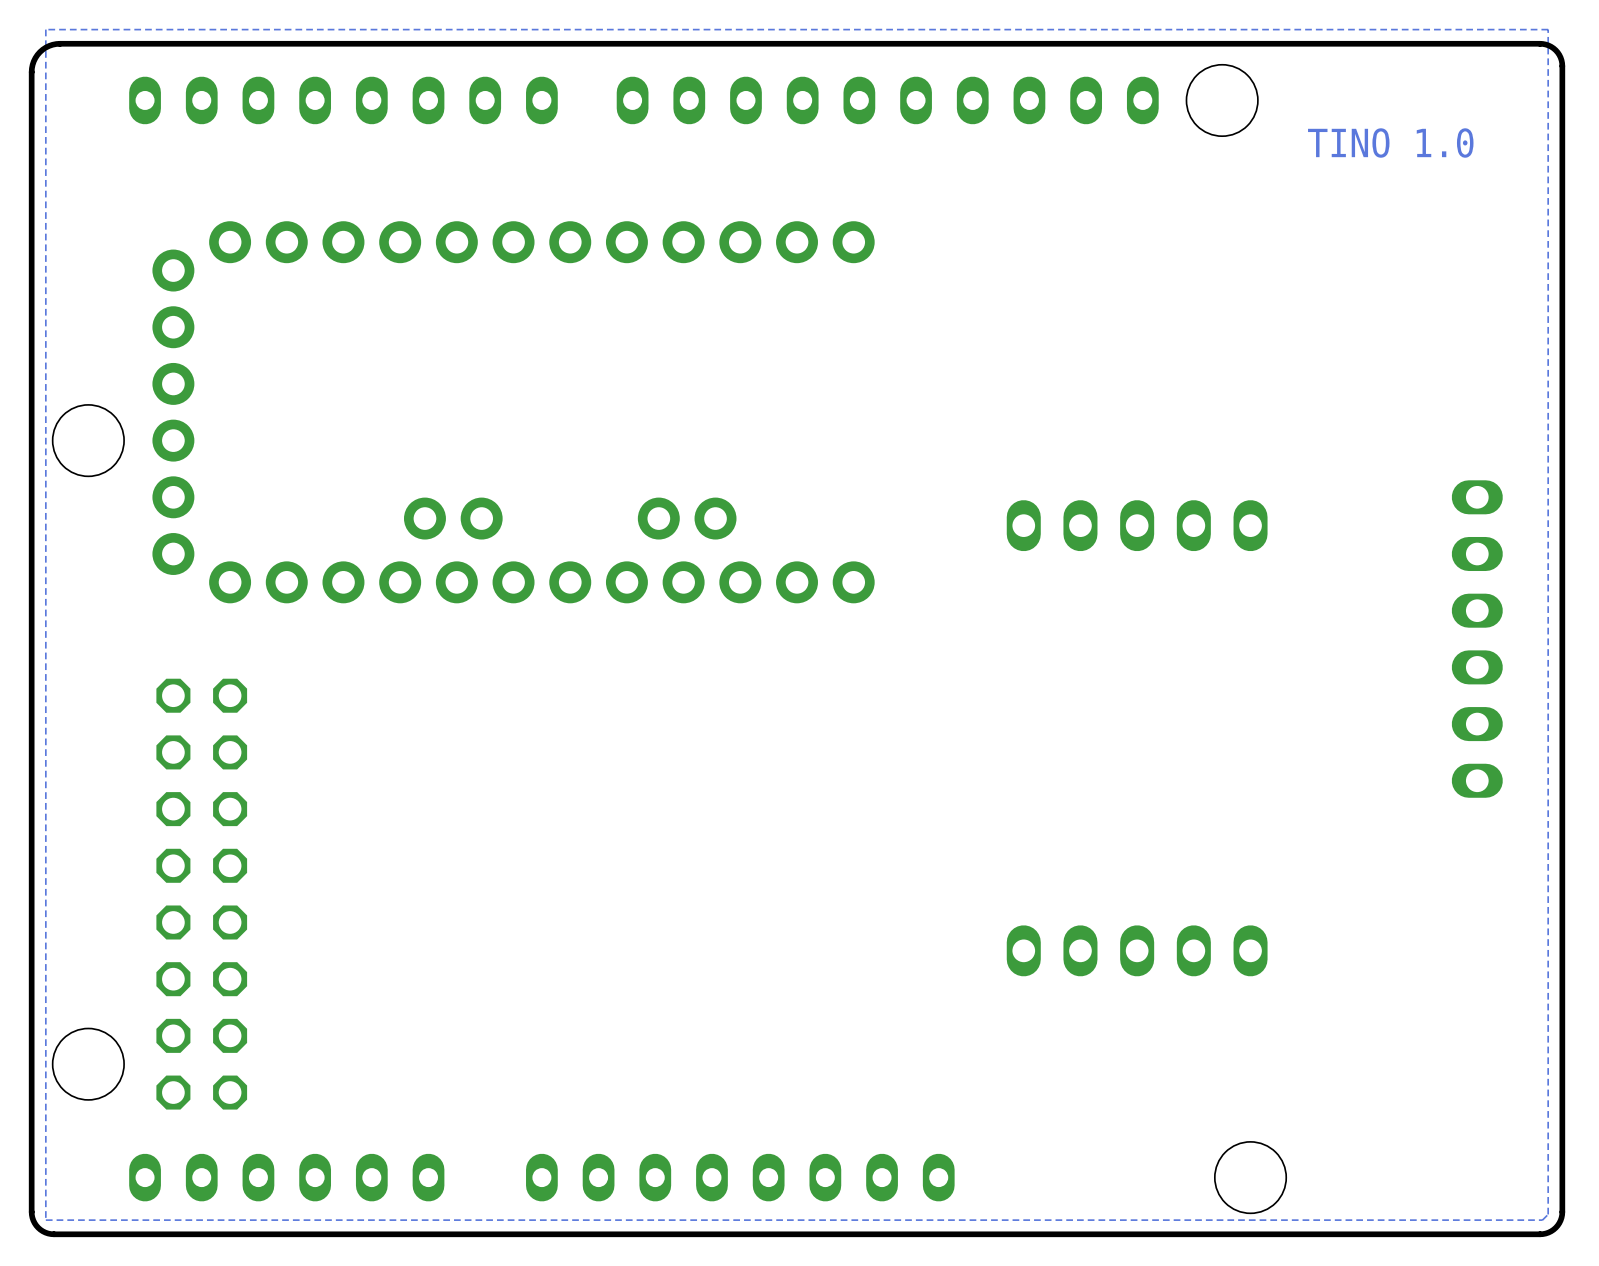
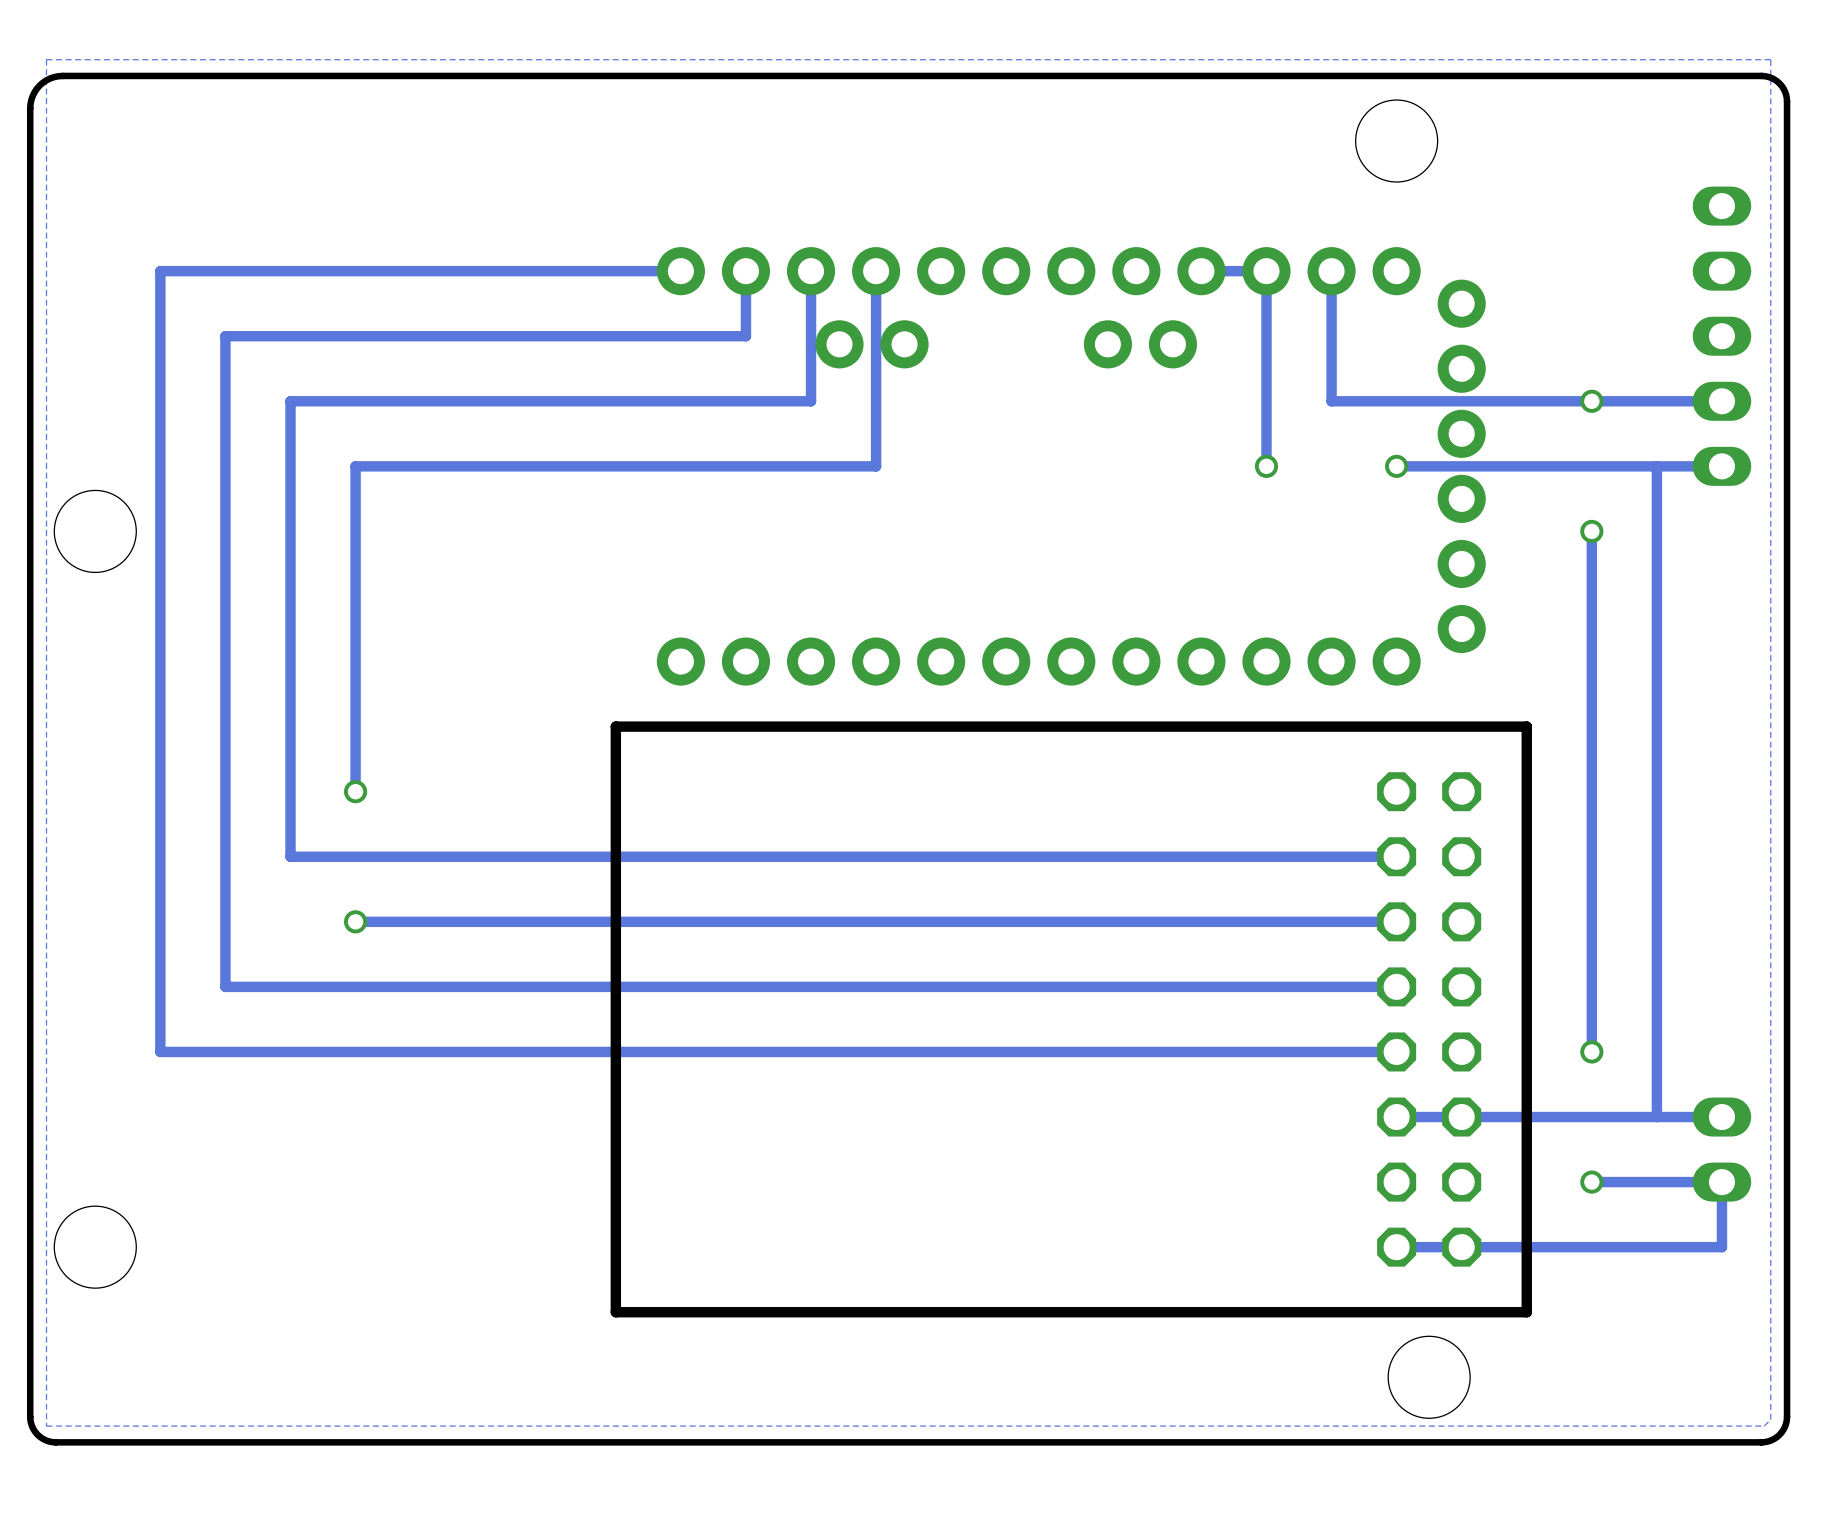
part: (343, 100) -> none
part: (887, 100) -> none
text: TINO 1.0 (1390, 143) -> none
track: none -> (680, 271) (160, 271) (160, 1051) (1396, 1051)
track: none -> (745, 271) (745, 336) (225, 336) (225, 986) (1396, 986)
track: none -> (811, 271) (811, 401) (290, 401) (290, 856) (1396, 856)
track: none -> (876, 271) (876, 466) (355, 466) (355, 791)
track: none -> (1201, 271) (1266, 271) (1266, 466)
track: none -> (1331, 271) (1331, 401) (1721, 401)
part: none -> (1721, 336)
via: none -> (1591, 401)
via: none -> (1266, 466)
via: none -> (1396, 466)
track: none -> (1656, 466) (1656, 1117)
track: none -> (1721, 466) (1396, 466)
part rotation: 0° (513, 412) -> 180° (1071, 466)
track: none -> (1591, 531) (1591, 1051)
via: none -> (1591, 531)
part: (1137, 525) -> none
board edge: none -> (1526, 726) (615, 726) (615, 1312) (1526, 1312) (1526, 726)
part: (1477, 639) -> none
via: none -> (355, 791)
via: none -> (355, 921)
track: none -> (1396, 921) (355, 921)
part: none -> (1429, 1019)
part: (201, 894) -> none
via: none -> (1591, 1051)
part: (1137, 950) -> none
track: none -> (1721, 1117) (1396, 1117)
part: none -> (1721, 1149)
track: none -> (1591, 1182) (1721, 1182) (1721, 1247) (1396, 1247)
via: none -> (1591, 1182)
part: (286, 1177) -> none
part: (740, 1177) -> none

